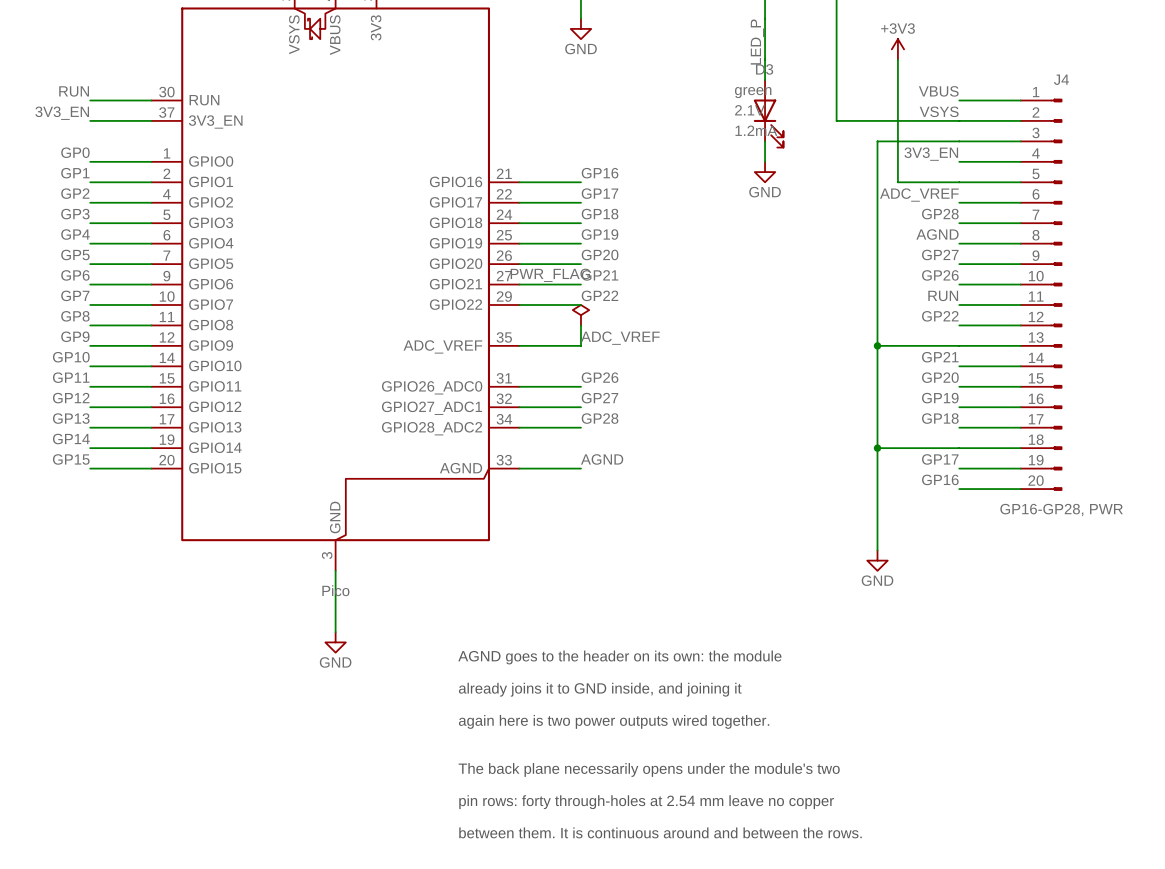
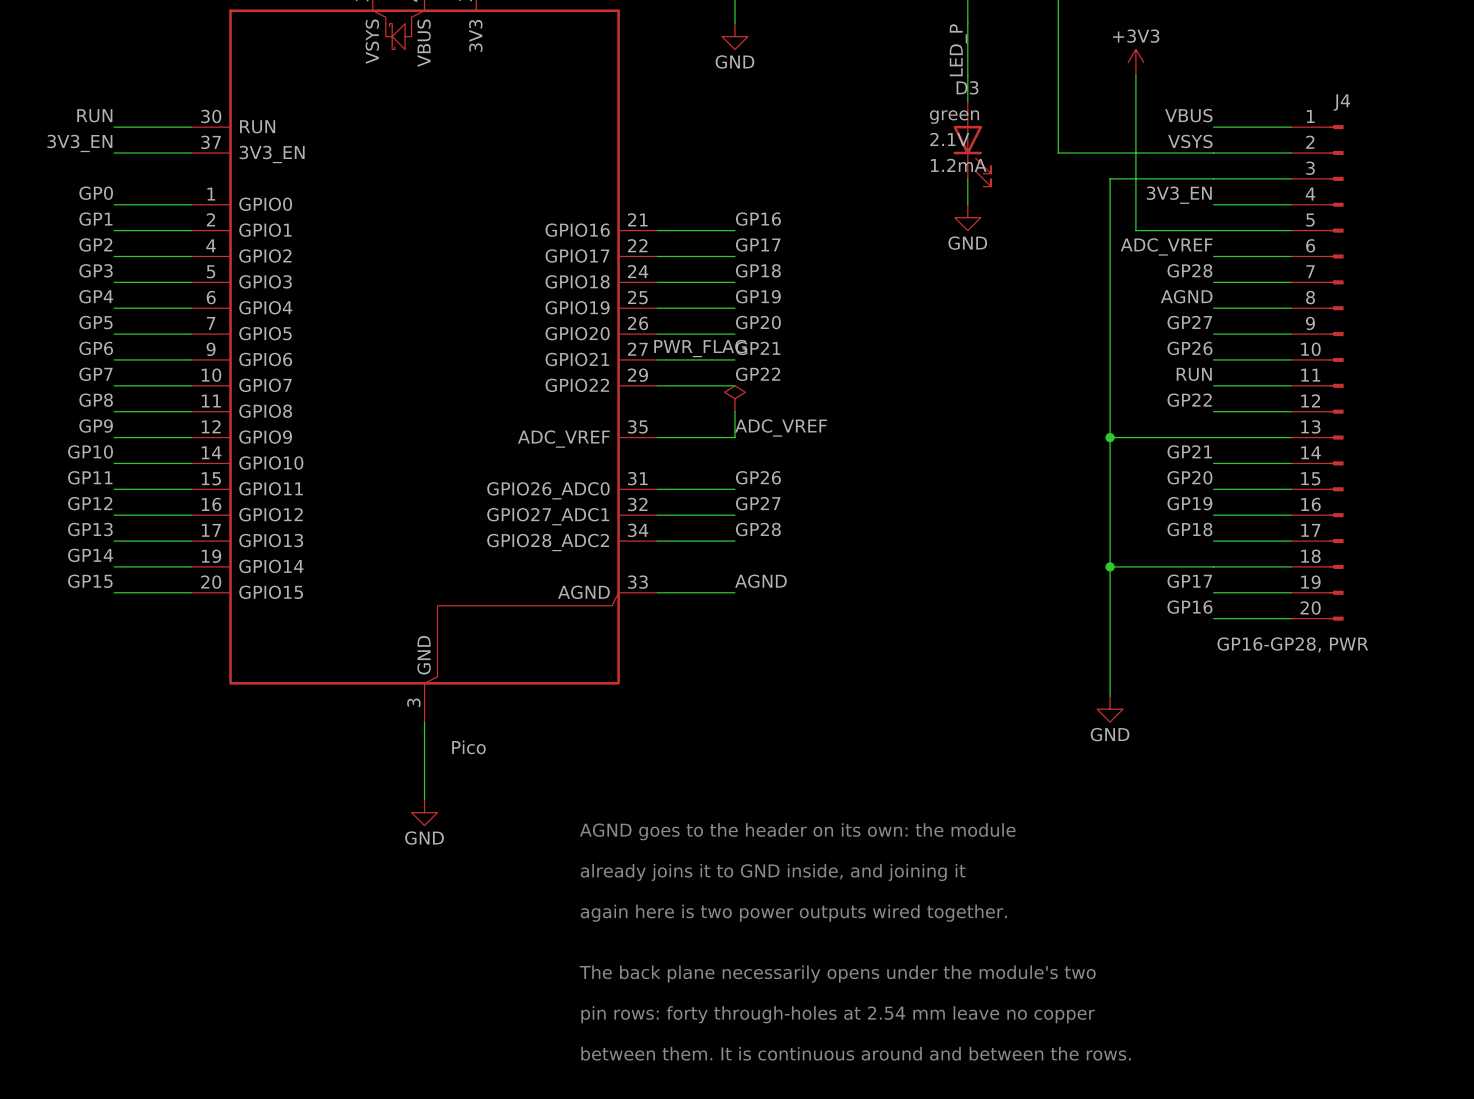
J4 value position: GP16-GP28, PWR (1061, 509) -> GP16-GP28, PWR (1292, 644)
part value position: Pico (335, 590) -> Pico (468, 747)

